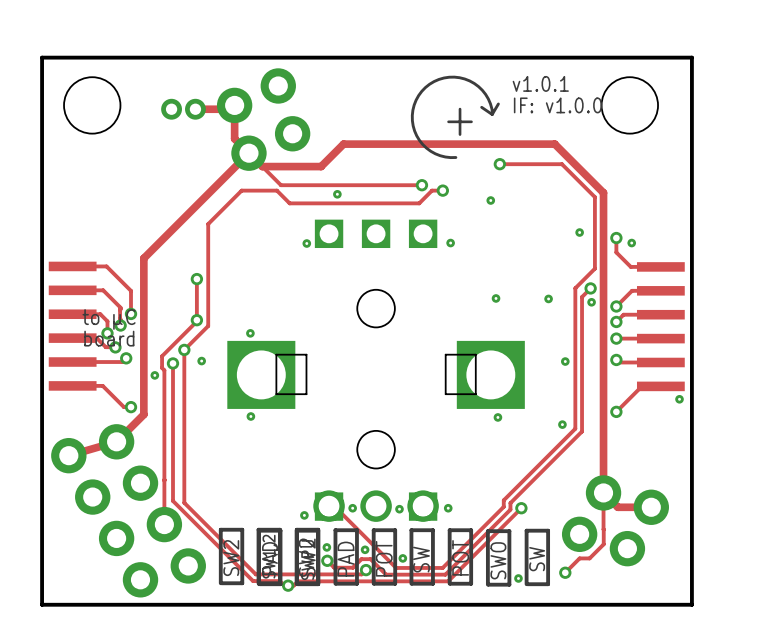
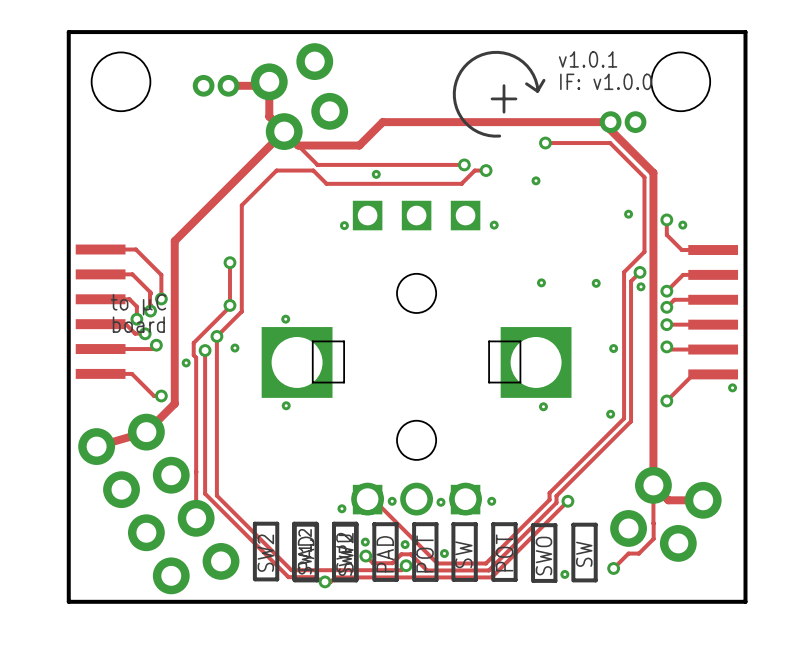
part: none -> (623, 122)

